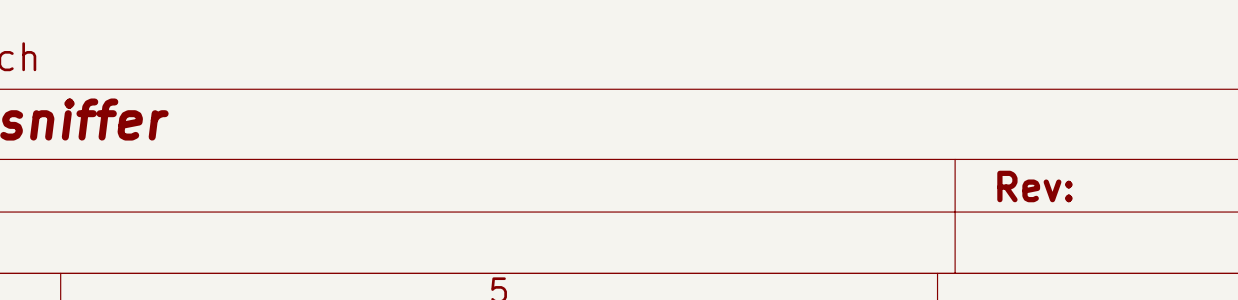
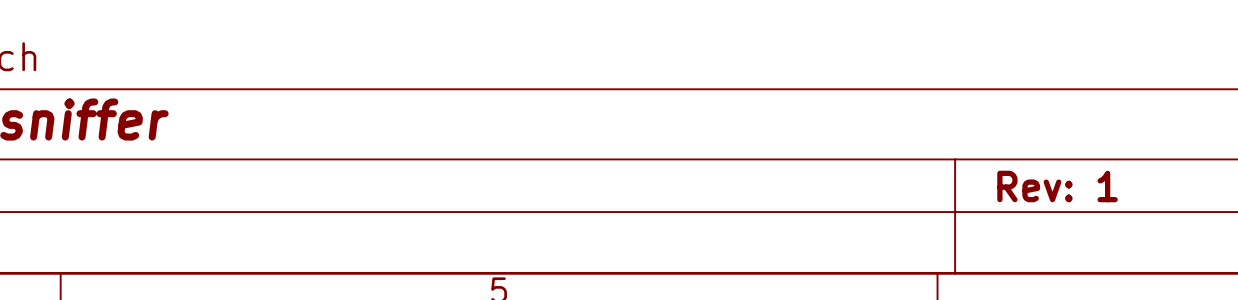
title block: Rev: (1034, 186) -> Rev: 1 (1057, 186)

